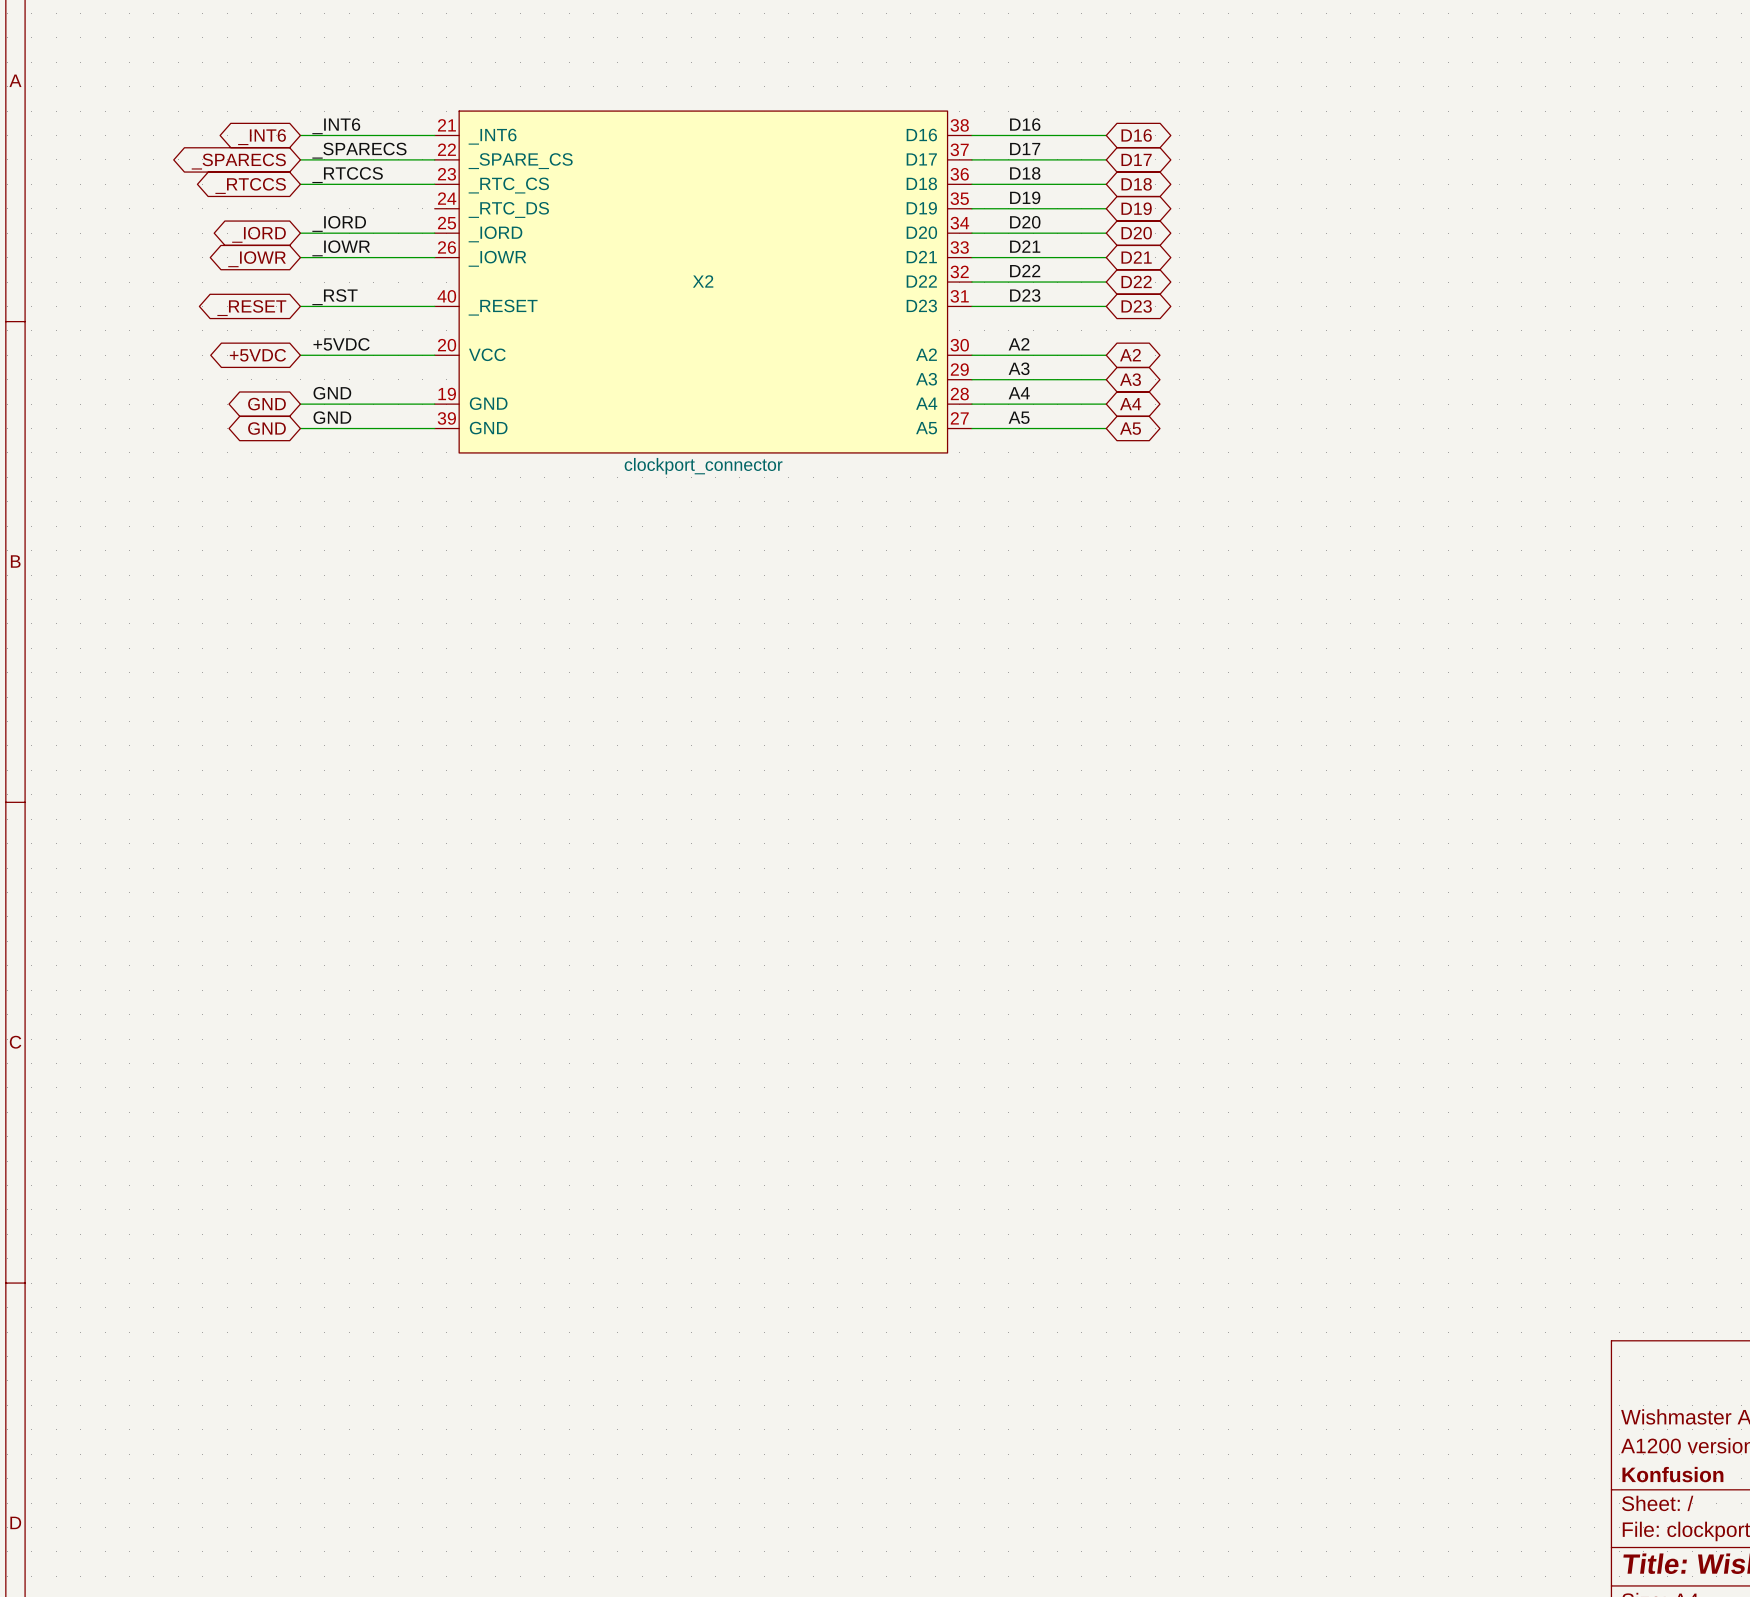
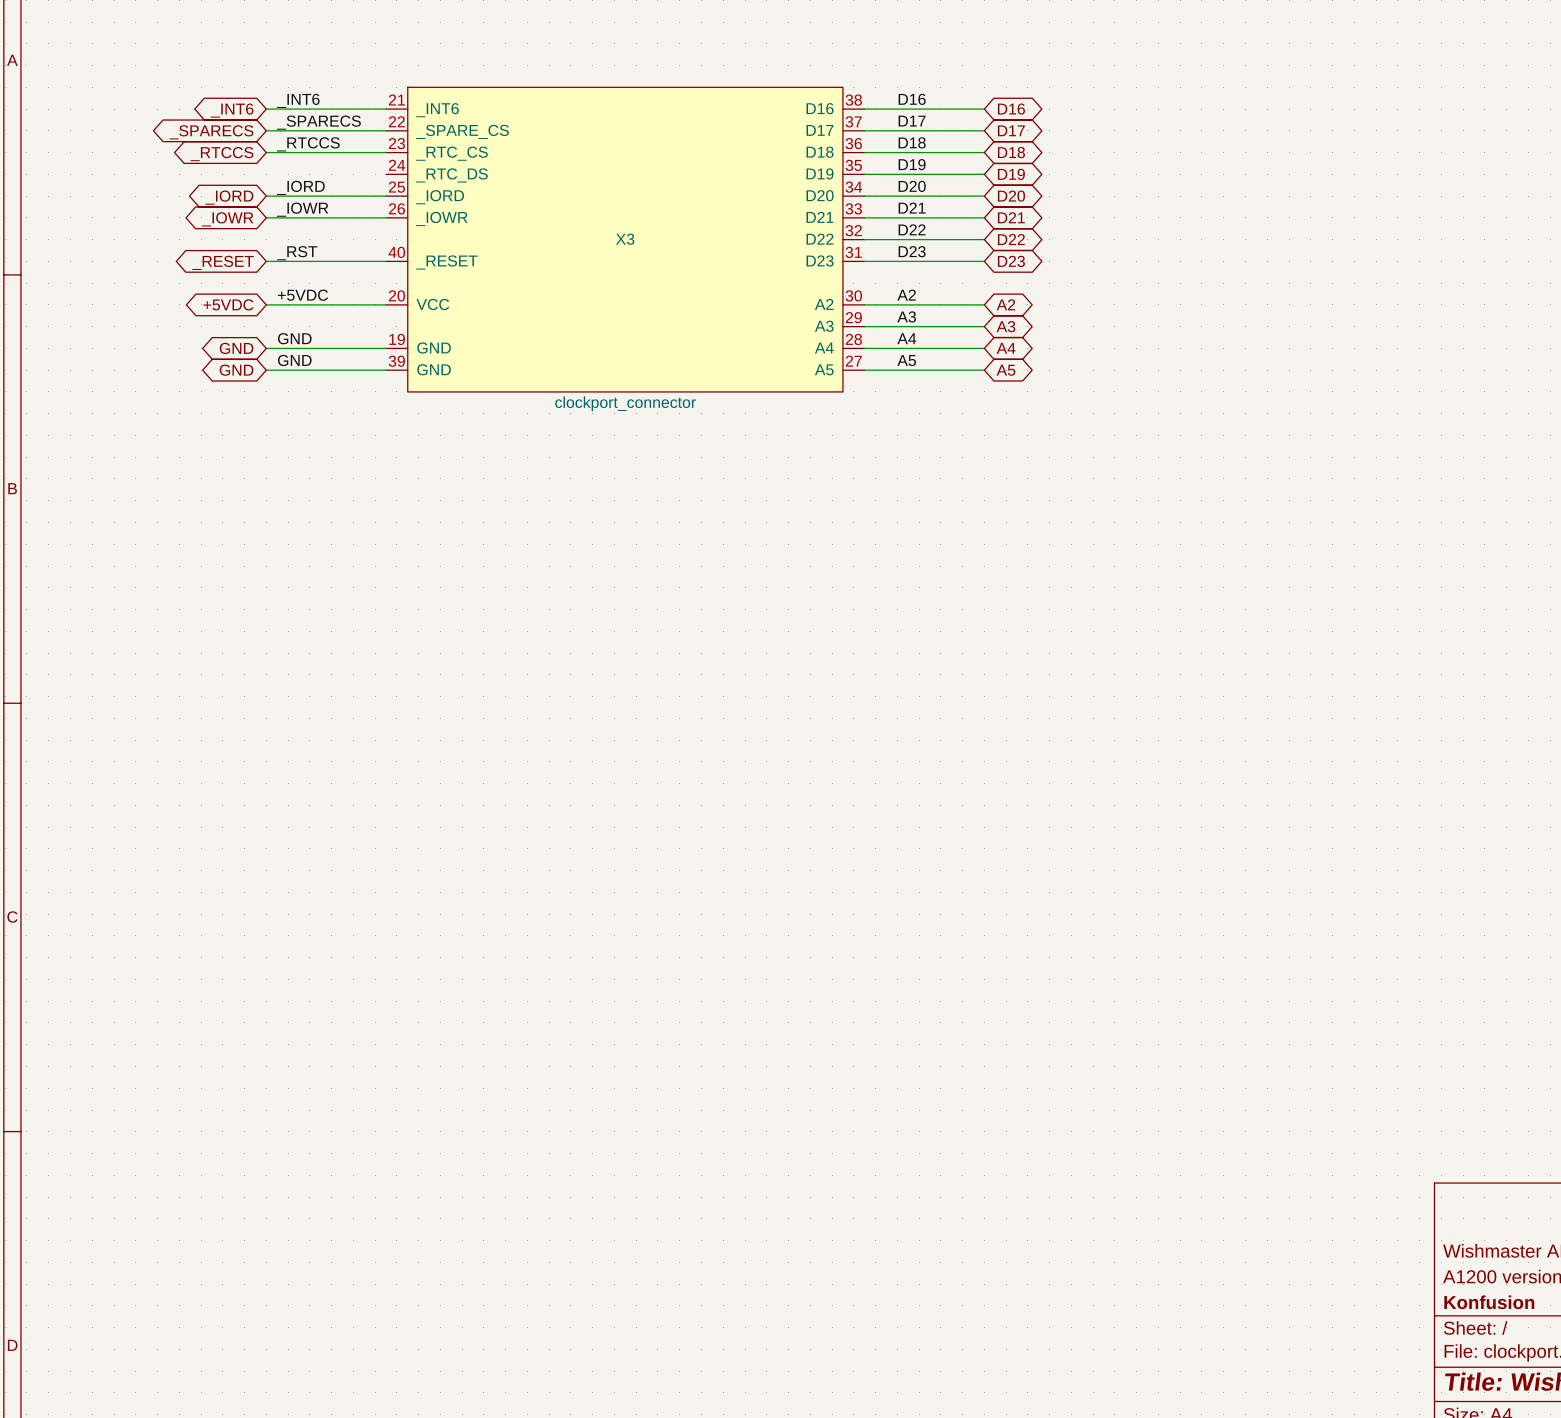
X2 name: X2 (703, 281) -> X3 (625, 239)

